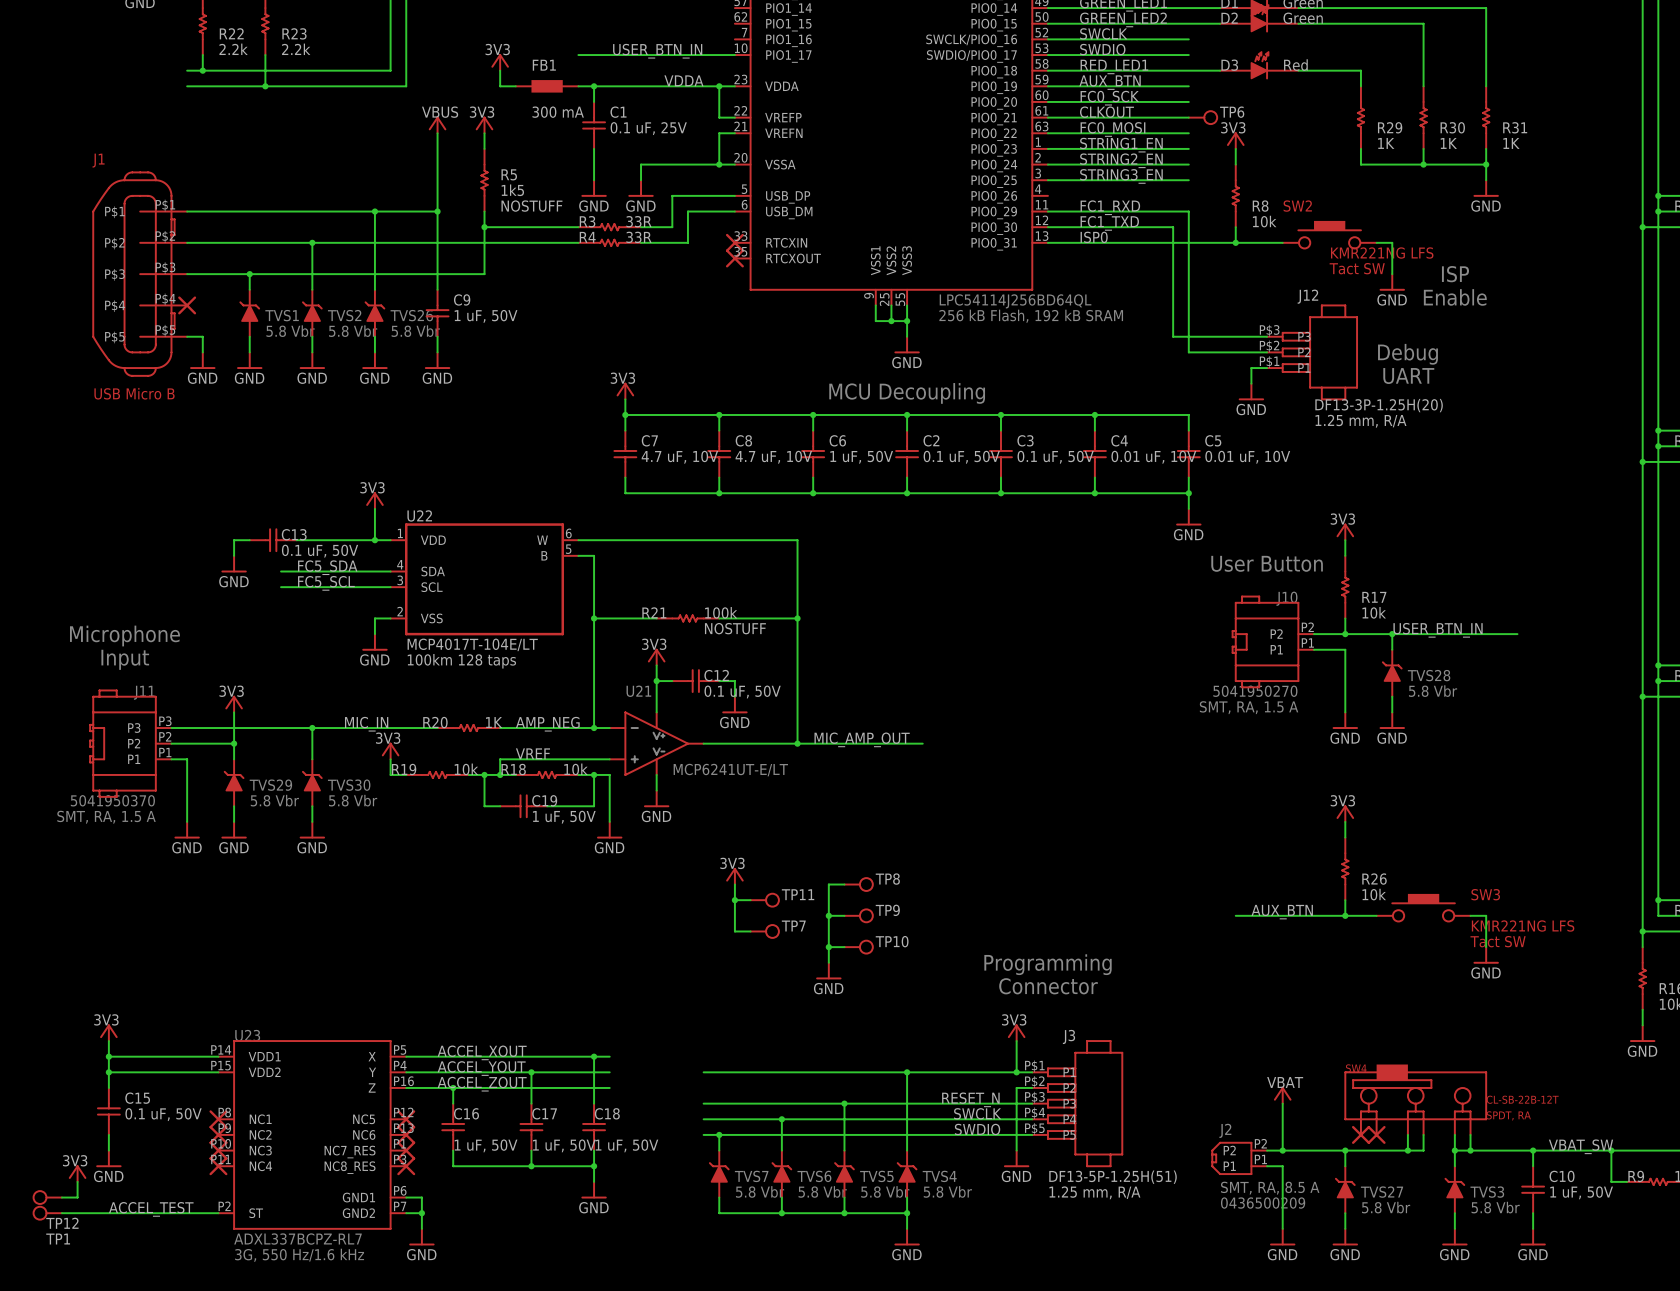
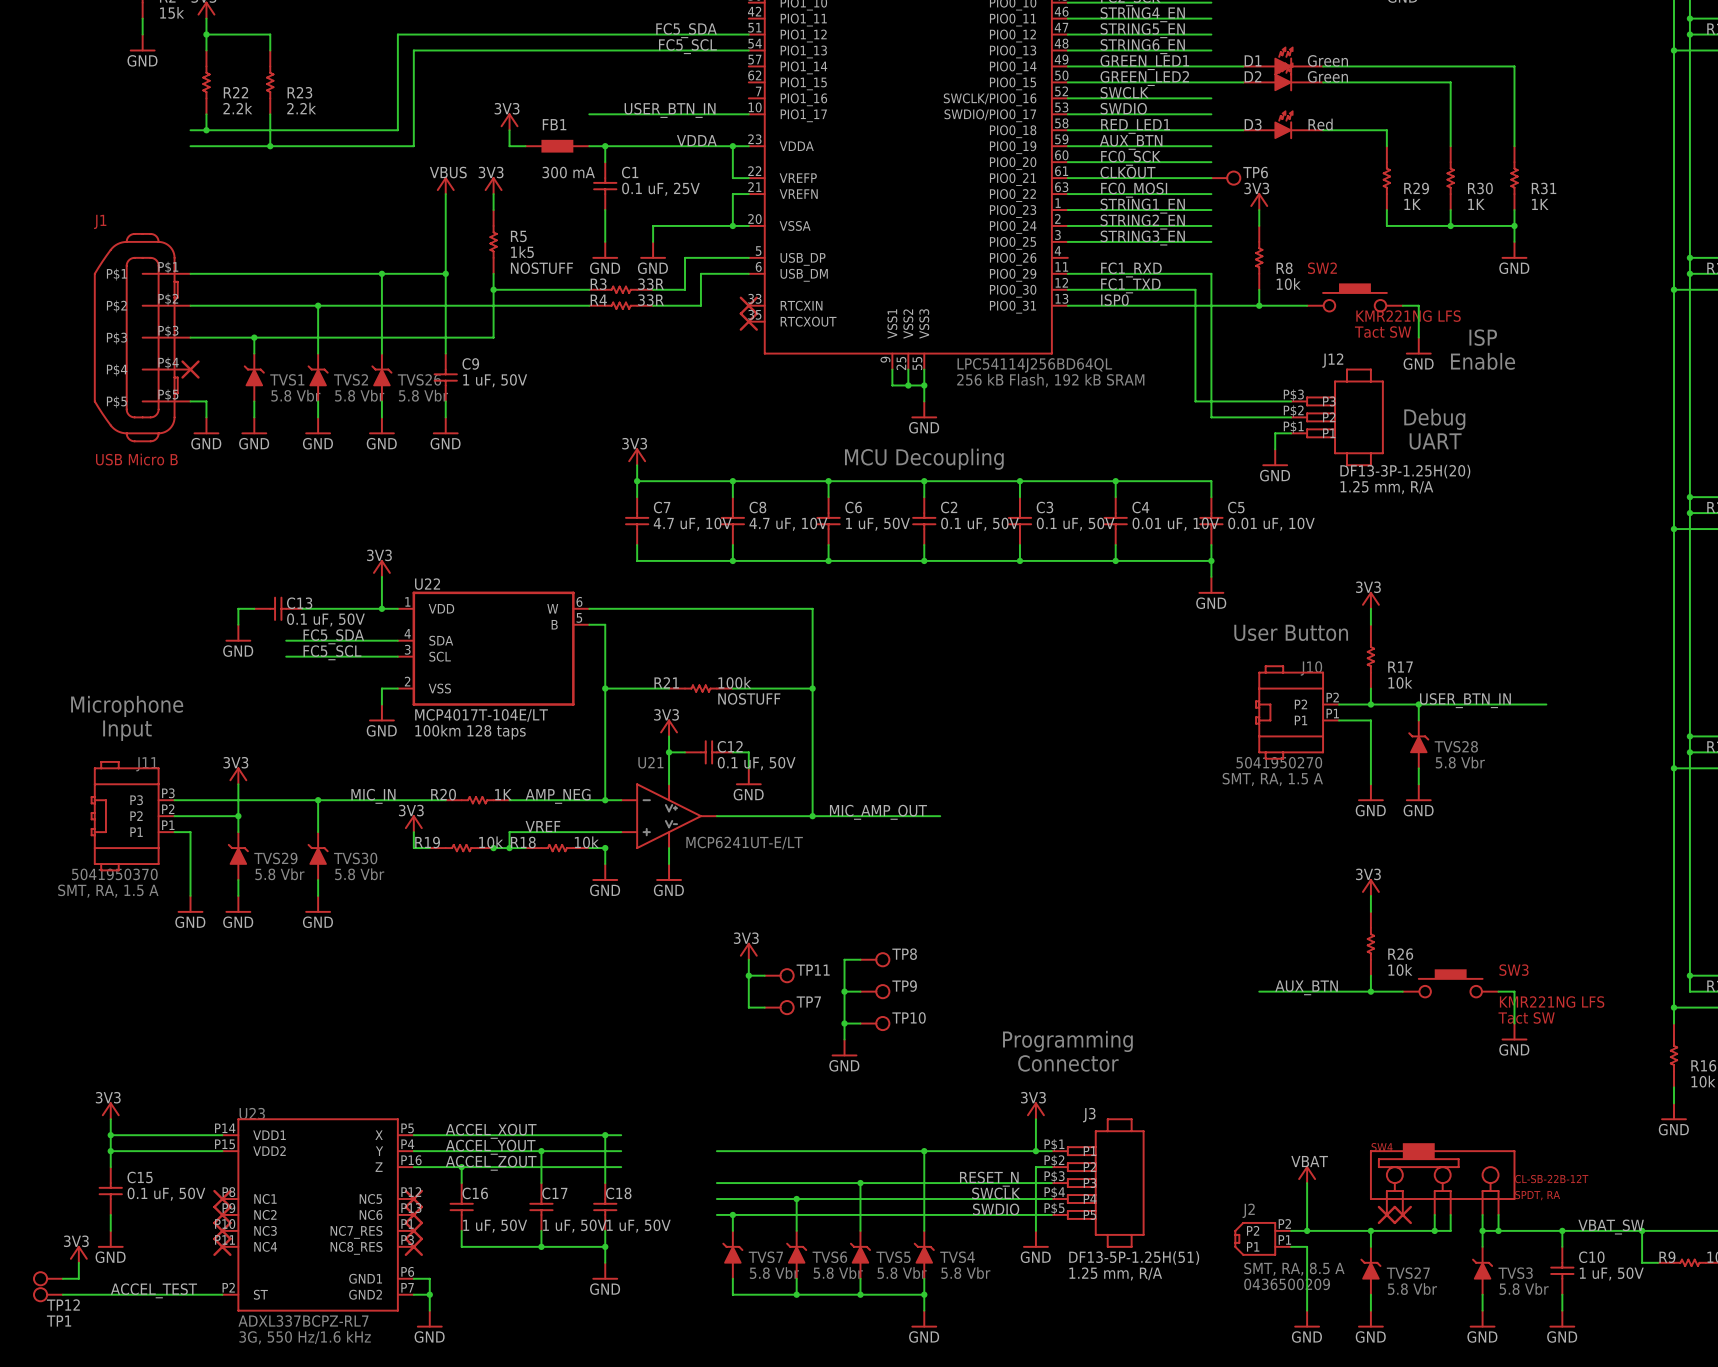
power symbol position: 3V3 (390, 751) -> 3V3 (413, 823)
R19 position: (437, 774) -> (461, 848)
wire: (468, 774) (484, 774) (484, 806) (500, 806) -> none
wire: (594, 774) (609, 774) (609, 821) -> none
wire: (594, 790) (594, 806) (547, 806) -> none
C19: (523, 806) -> none
power symbol position: GND (609, 830) -> GND (605, 872)

